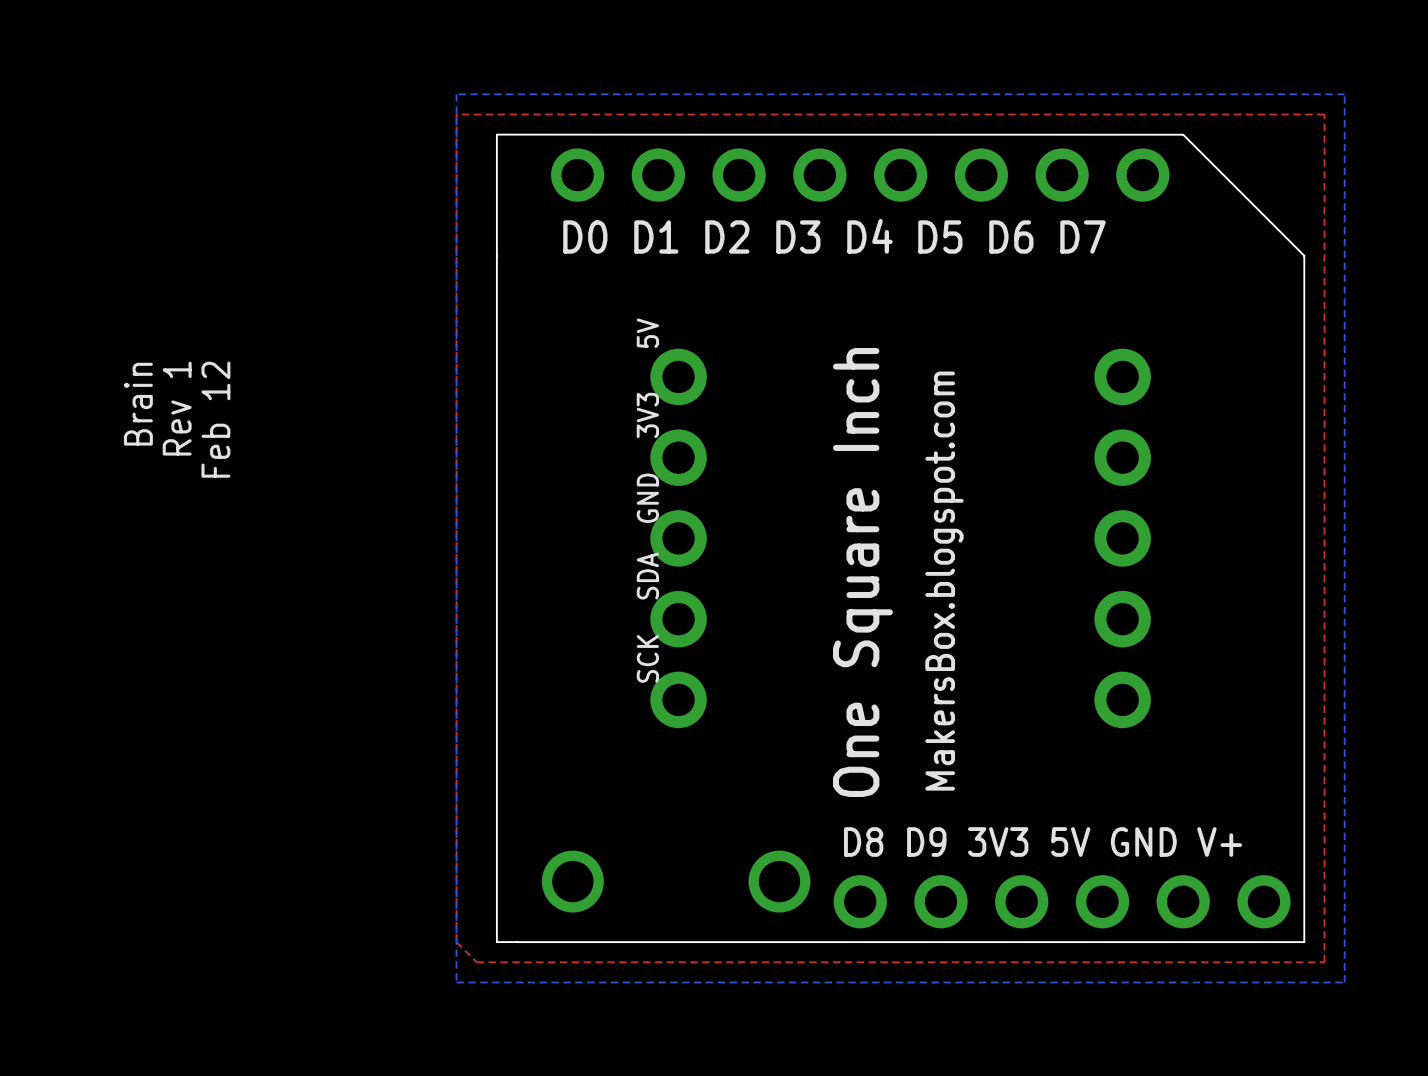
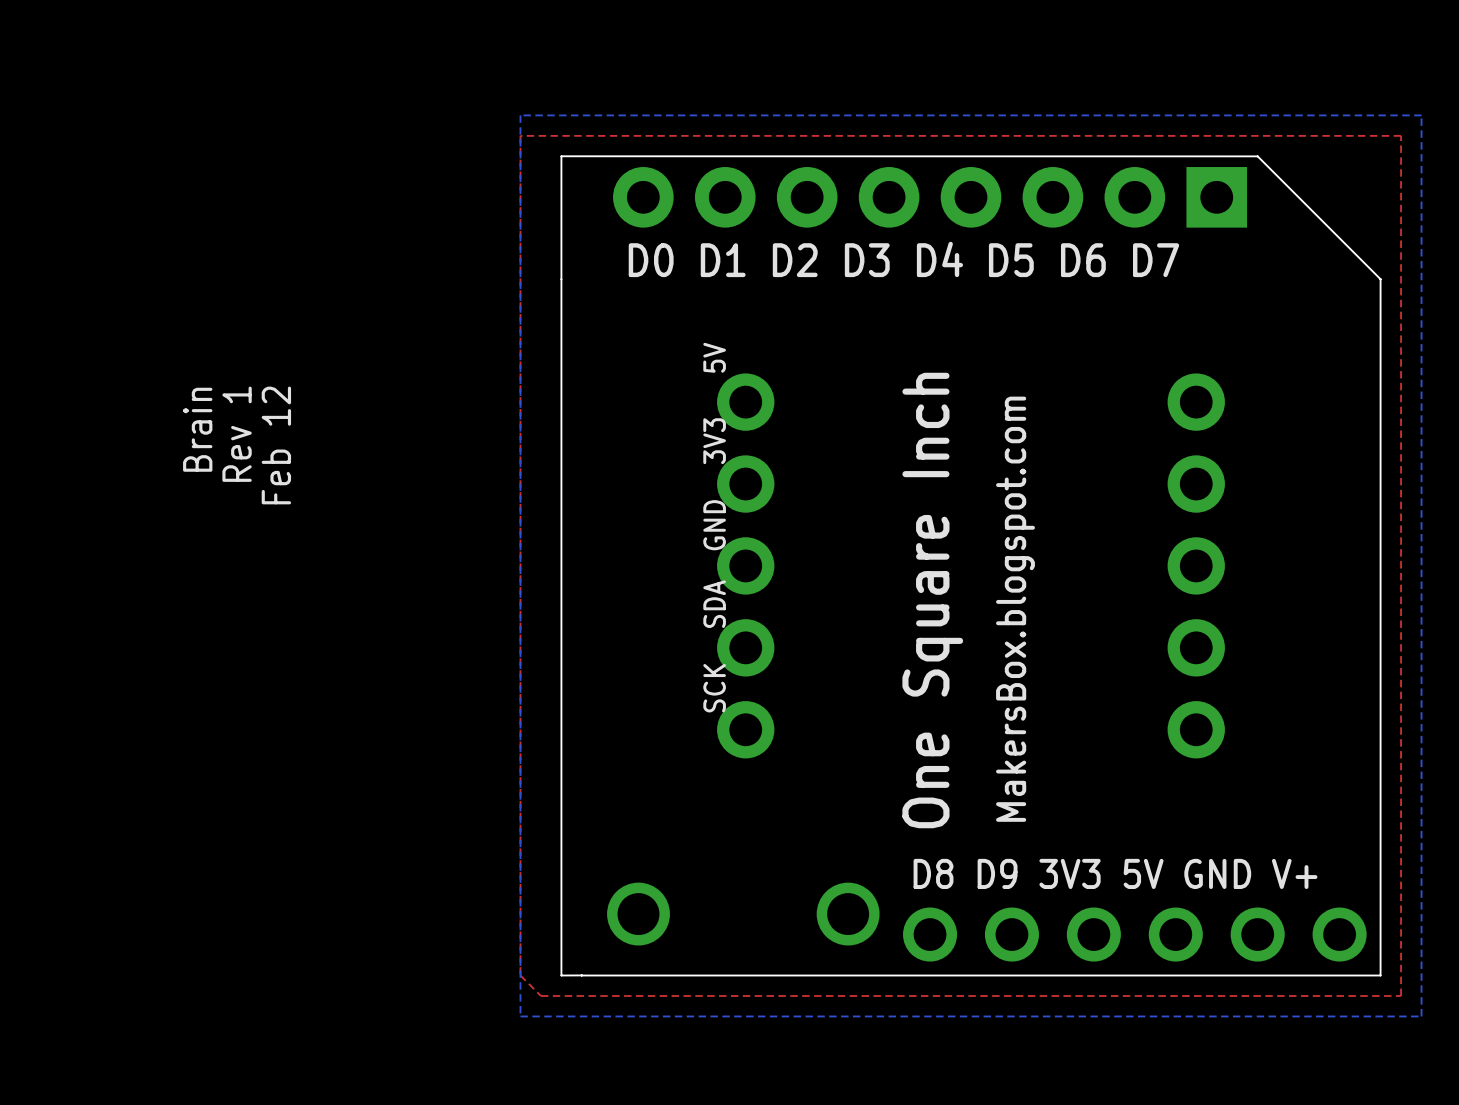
part footprint: [550, 148, 1170, 202] -> [613, 167, 1248, 228]

